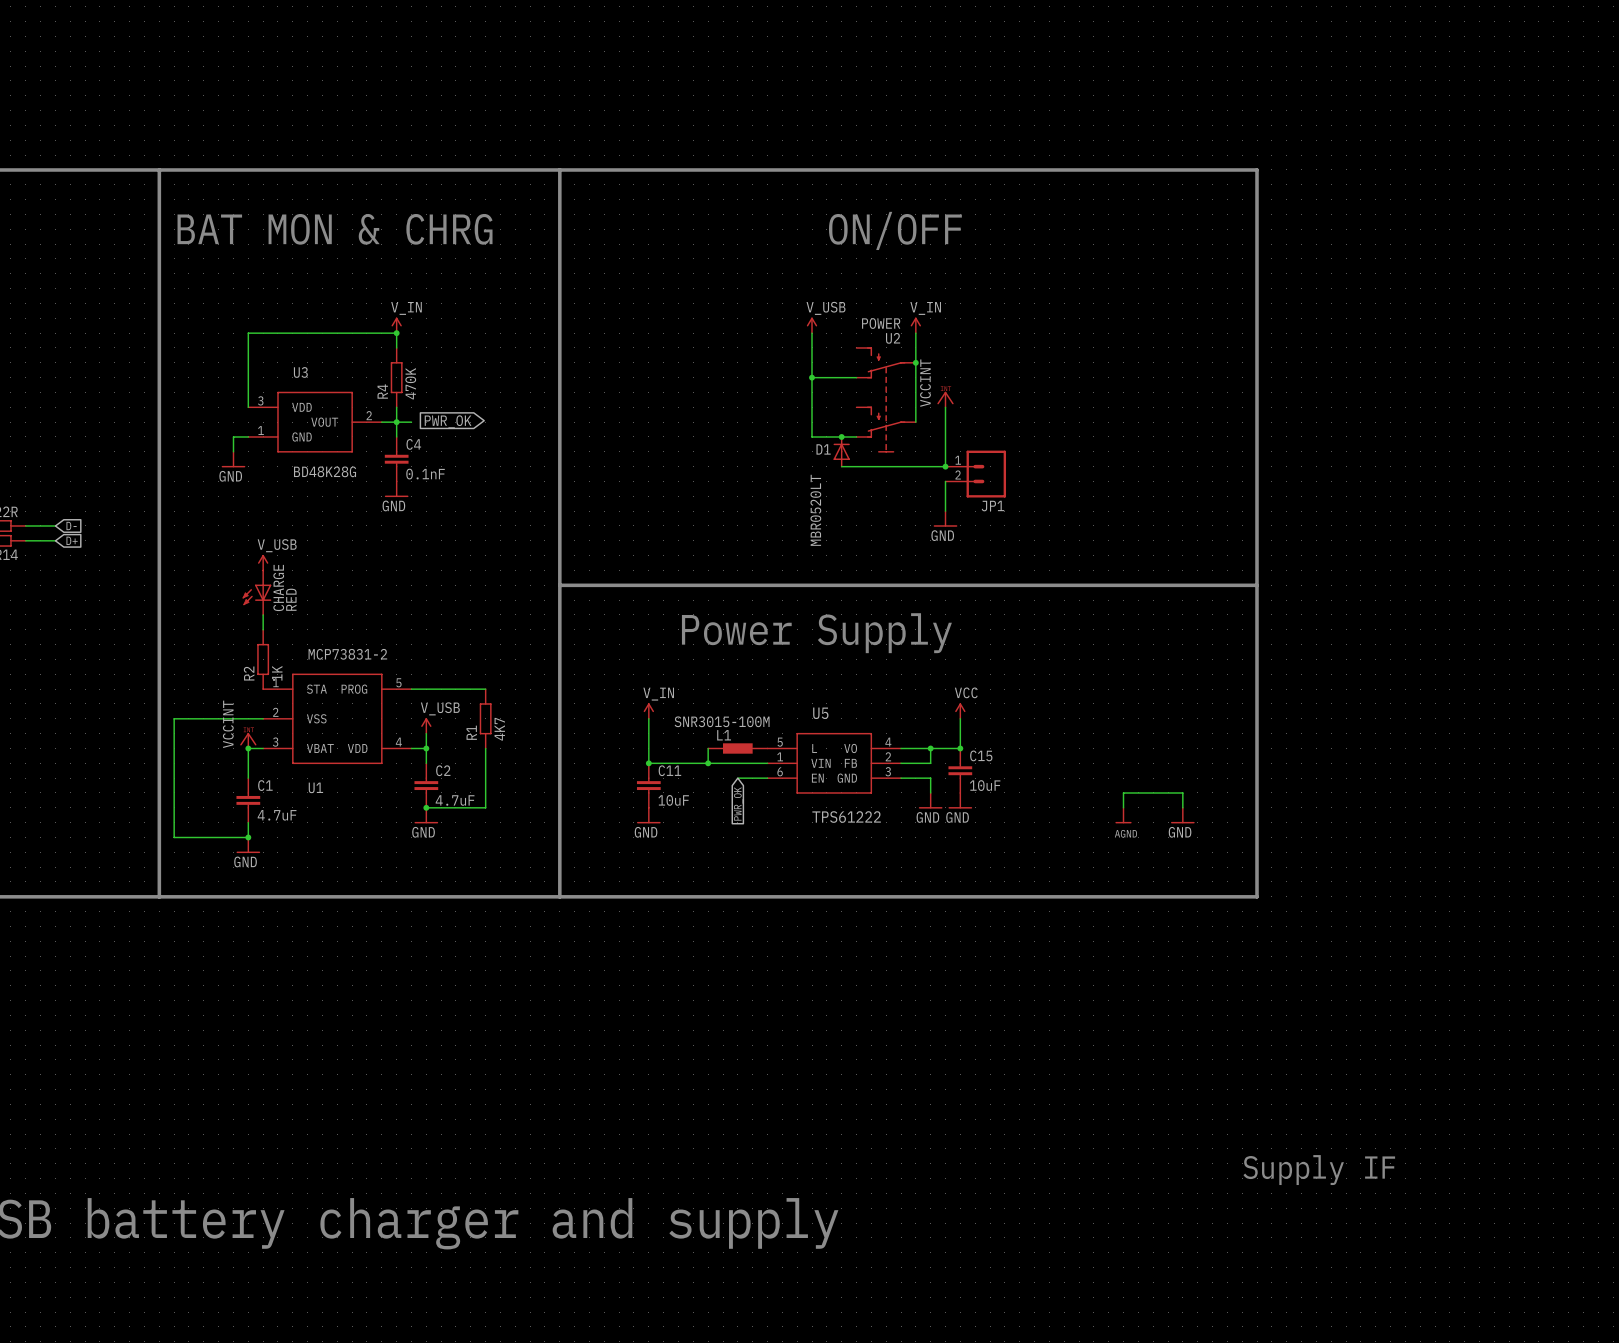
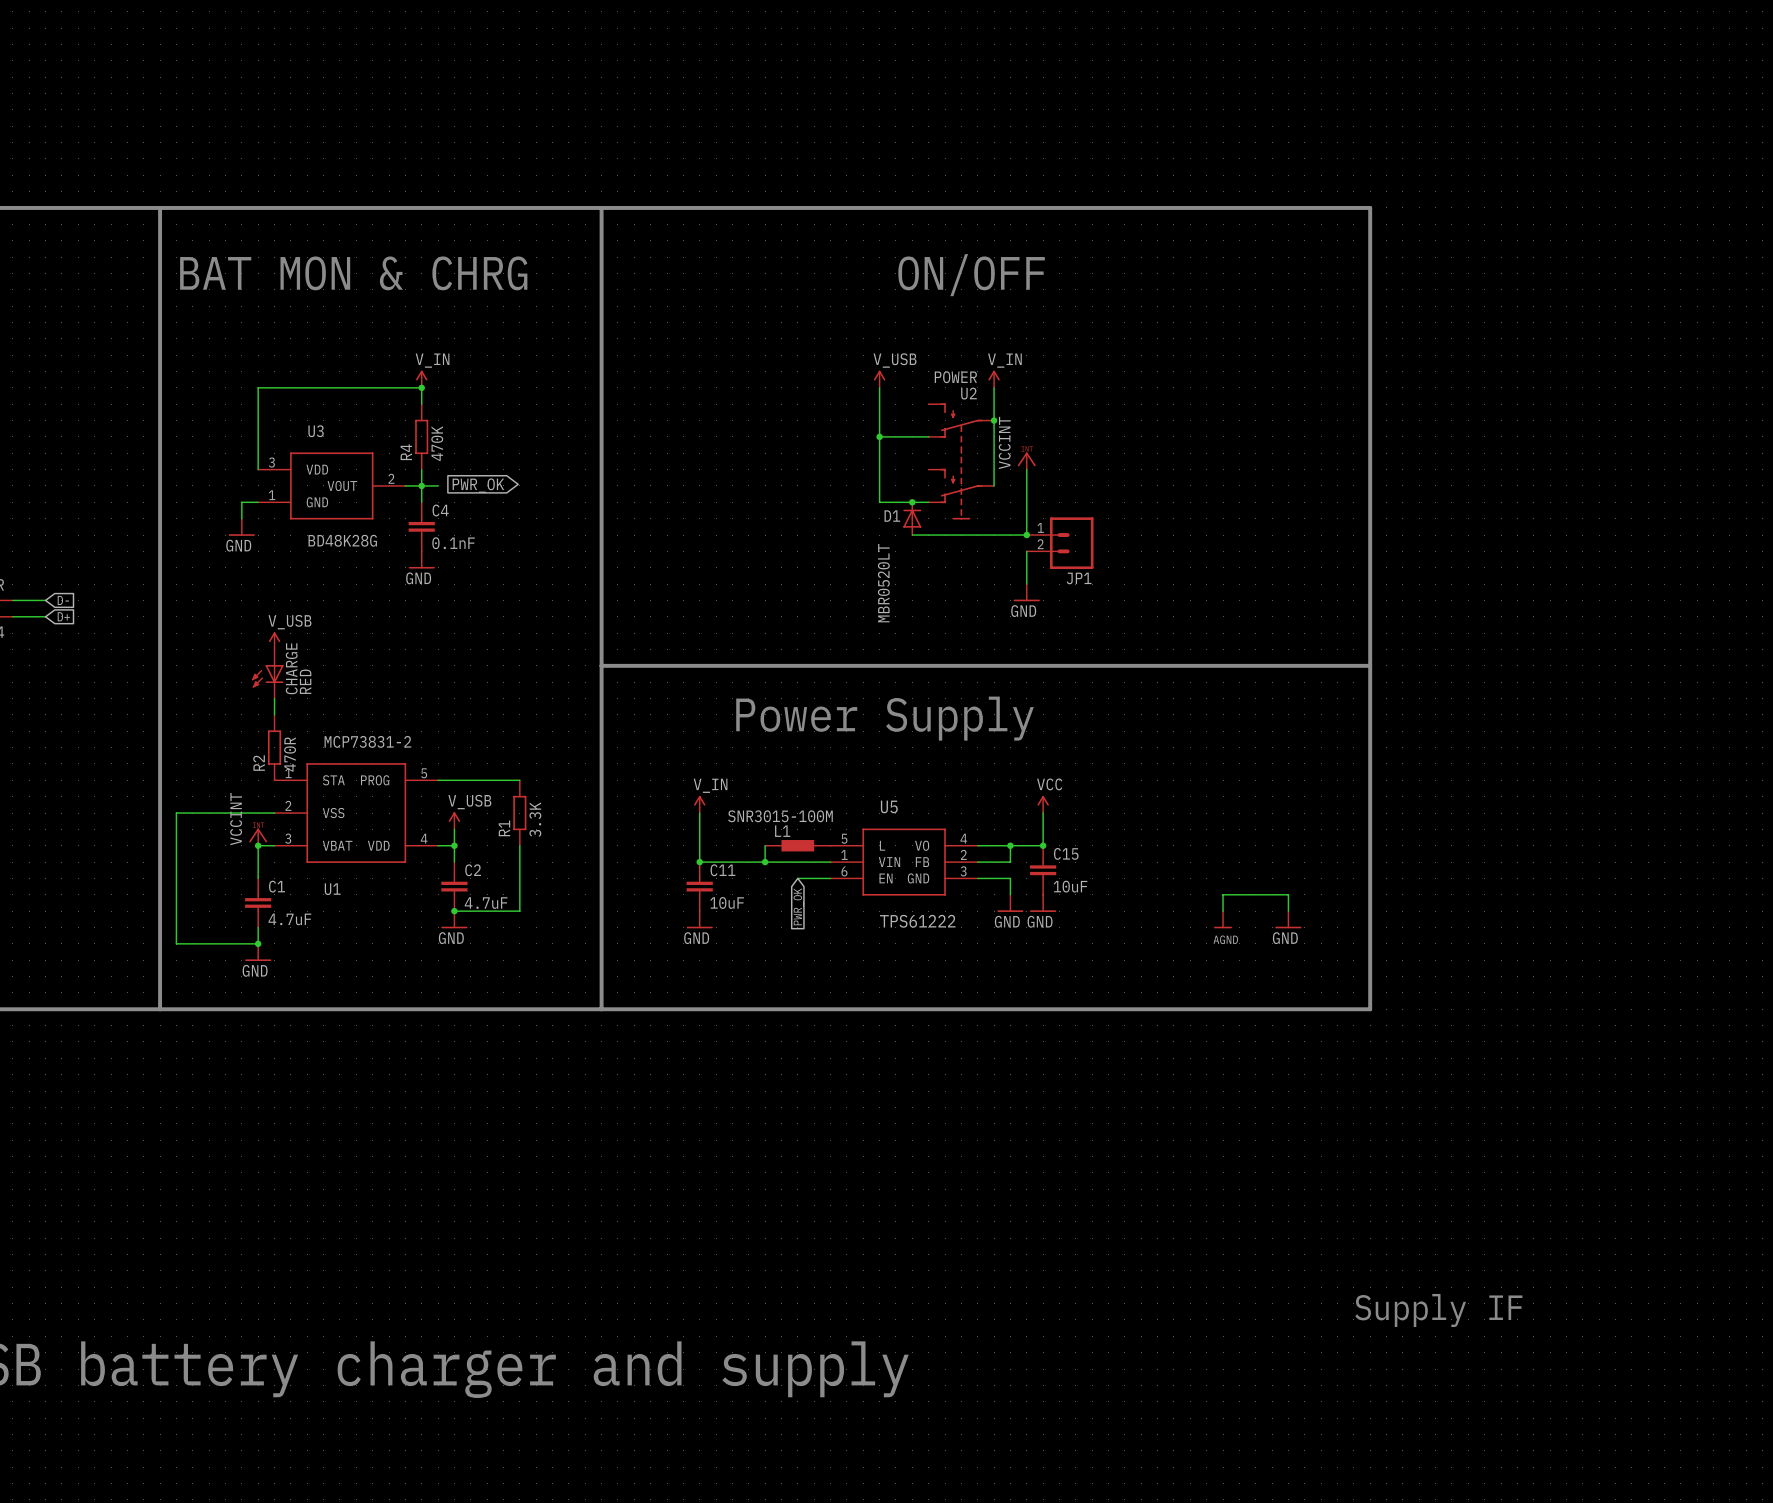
R2 value: 1K (277, 673) -> 470R (290, 754)
R1 value: 4K7 (499, 729) -> 3.3K (535, 819)

